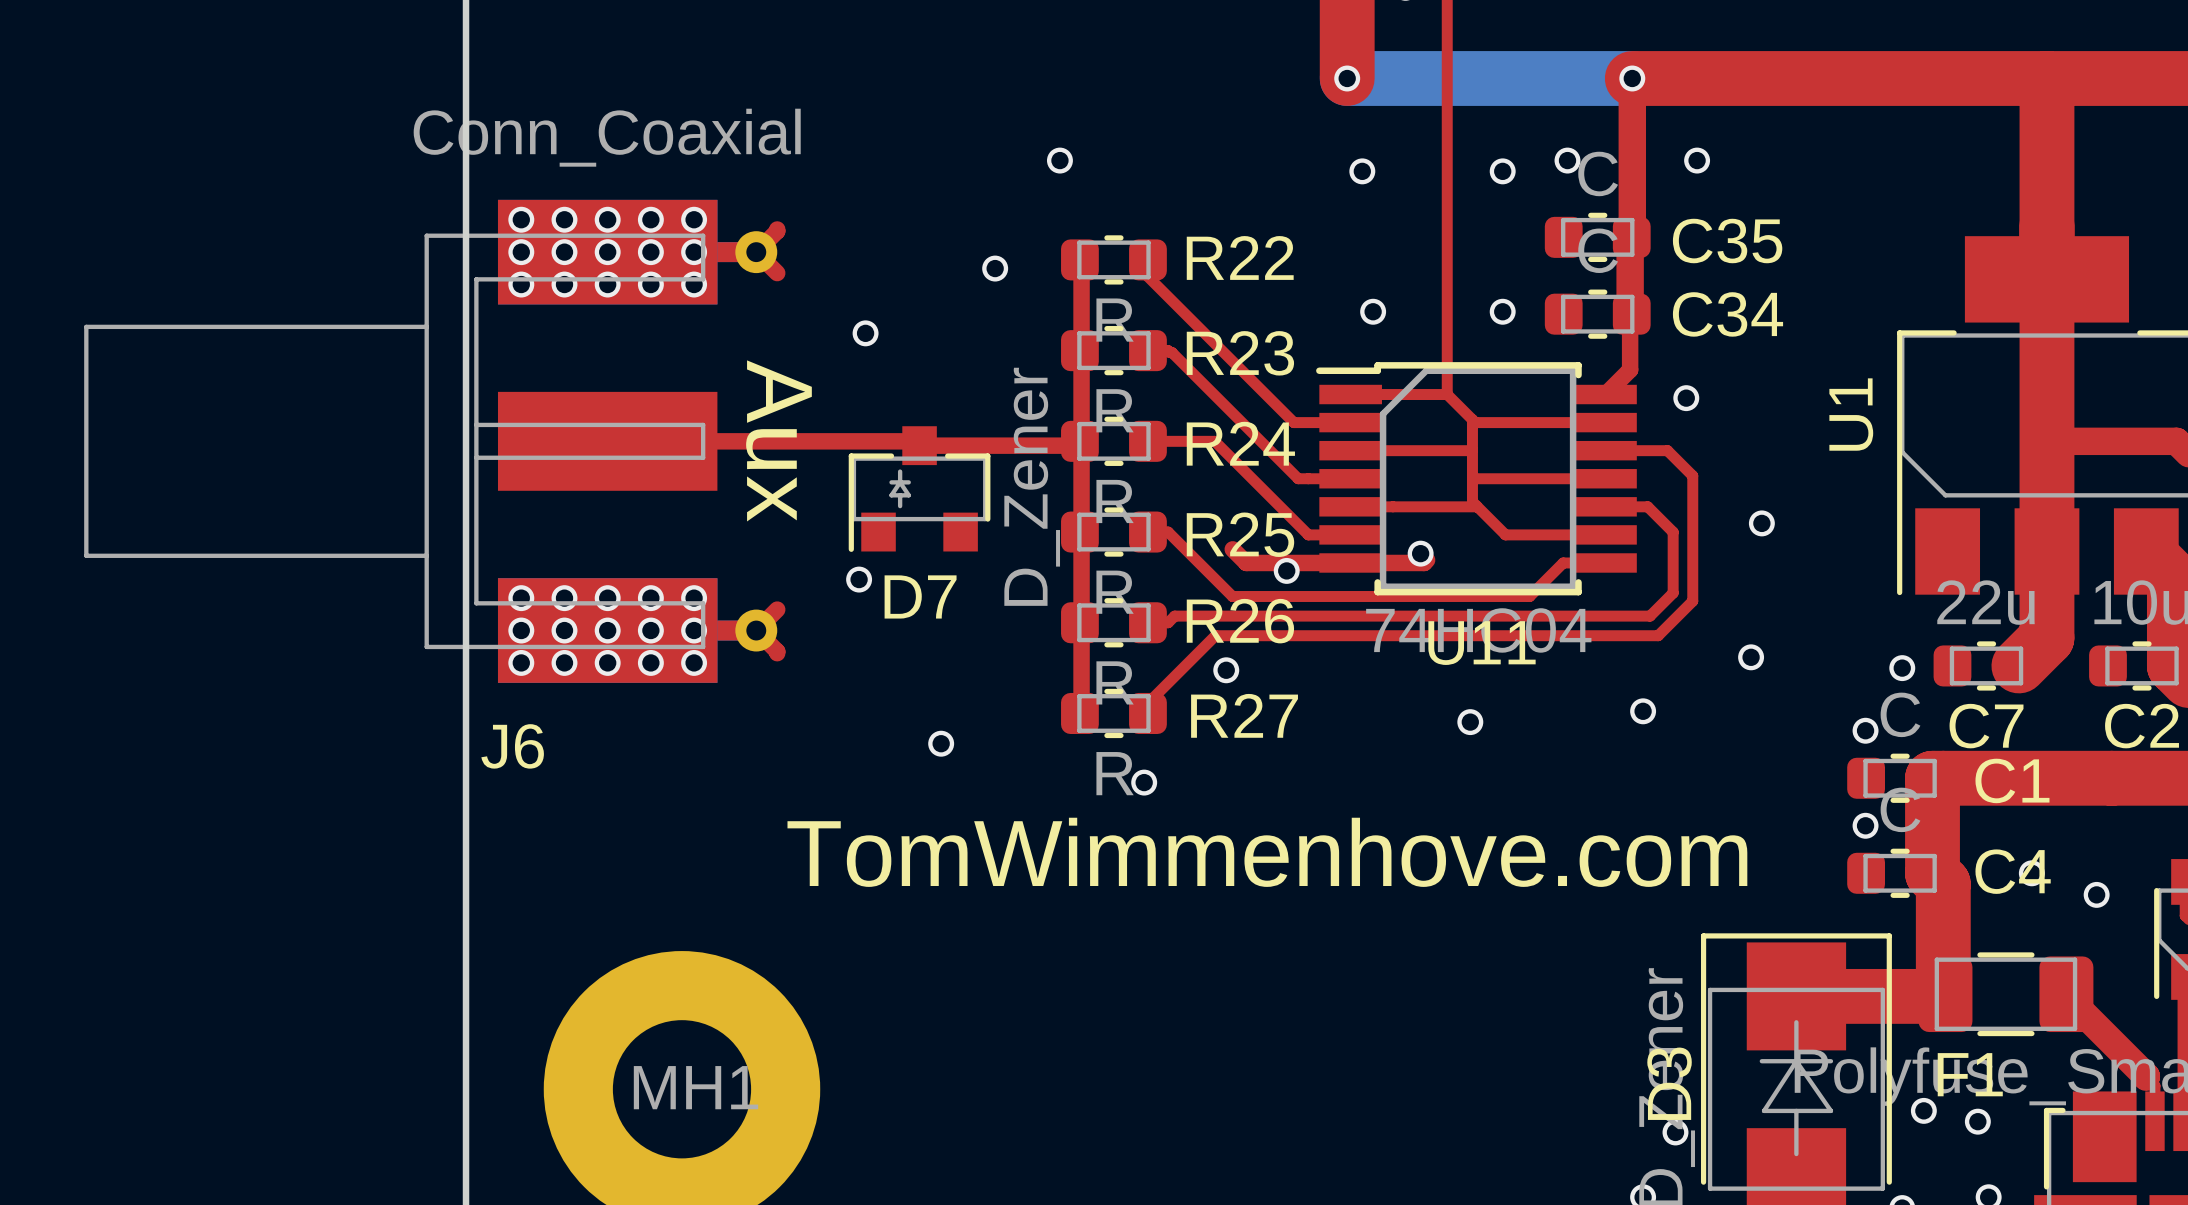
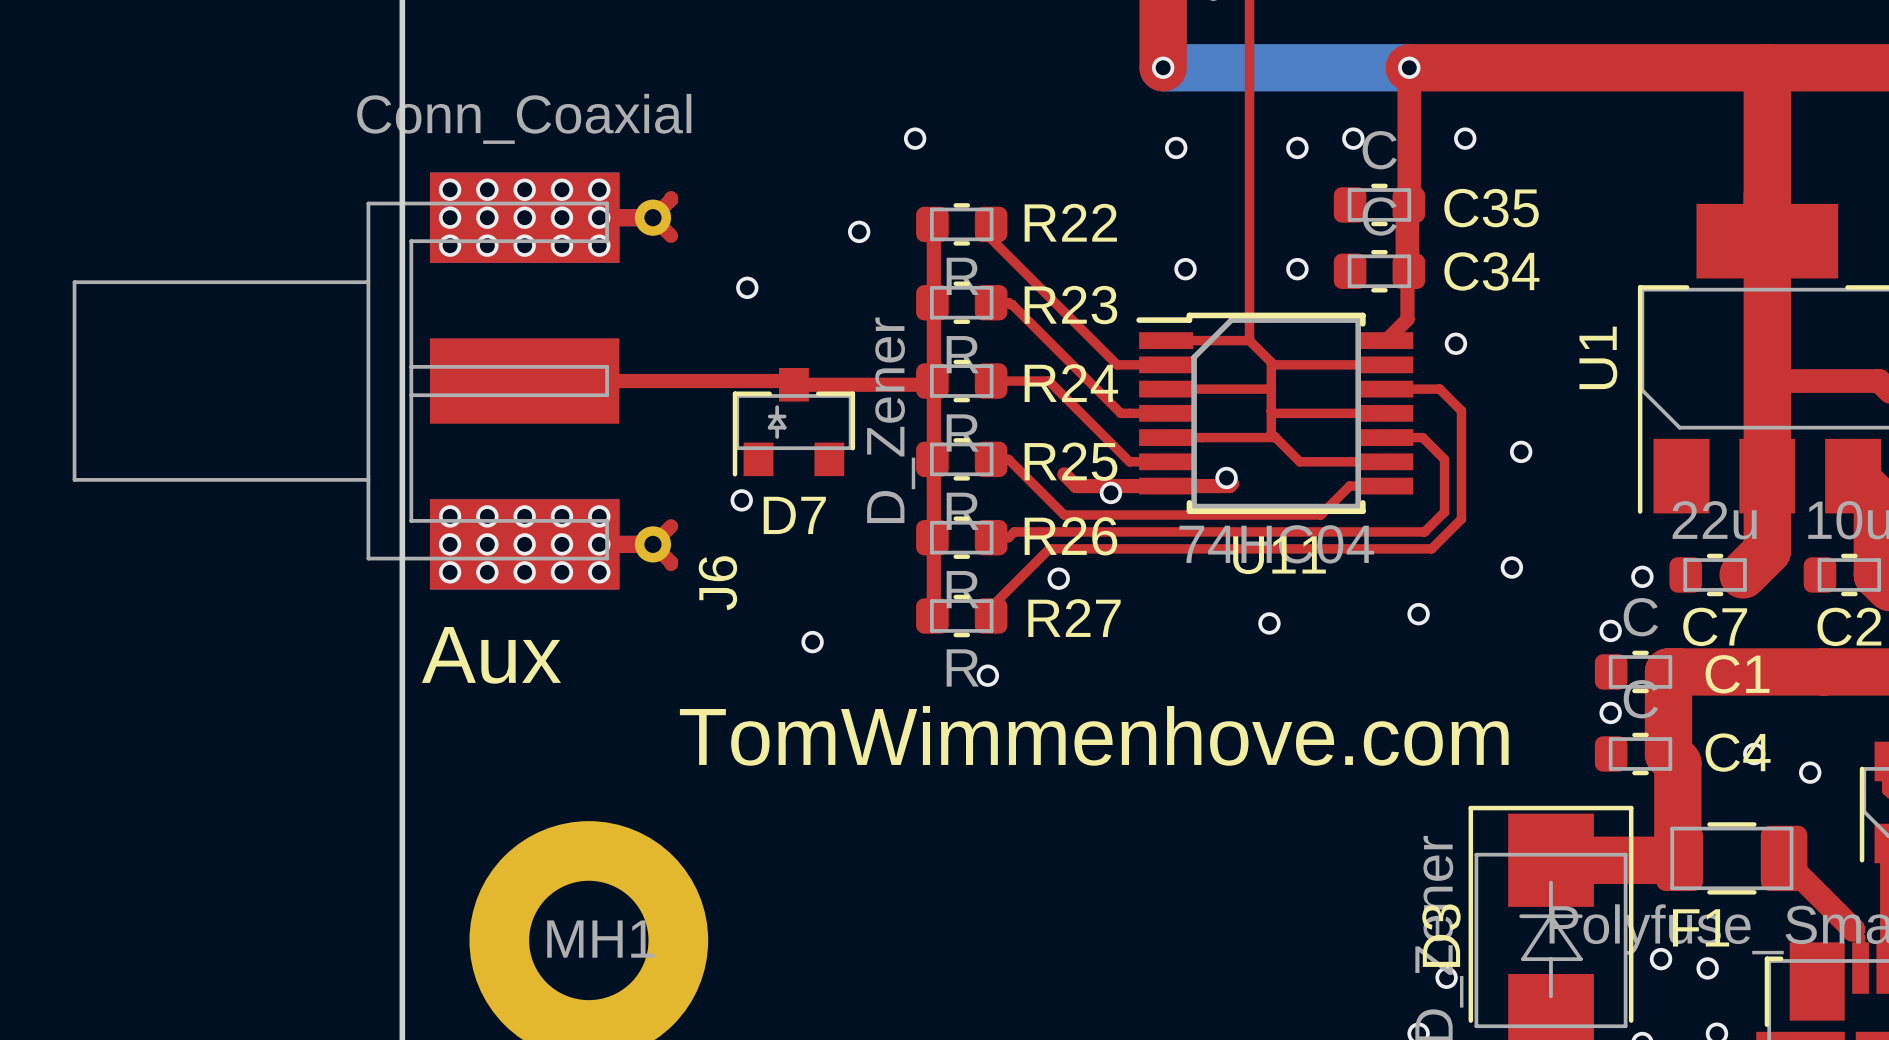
text rotation: 0° (778, 440) -> 90° counterclockwise (491, 655)
text position: Aux (778, 440) -> Aux (491, 655)
J6 name rotation: 0° (512, 746) -> 90° counterclockwise (717, 583)
J6 name position: J6 (512, 746) -> J6 (717, 583)

